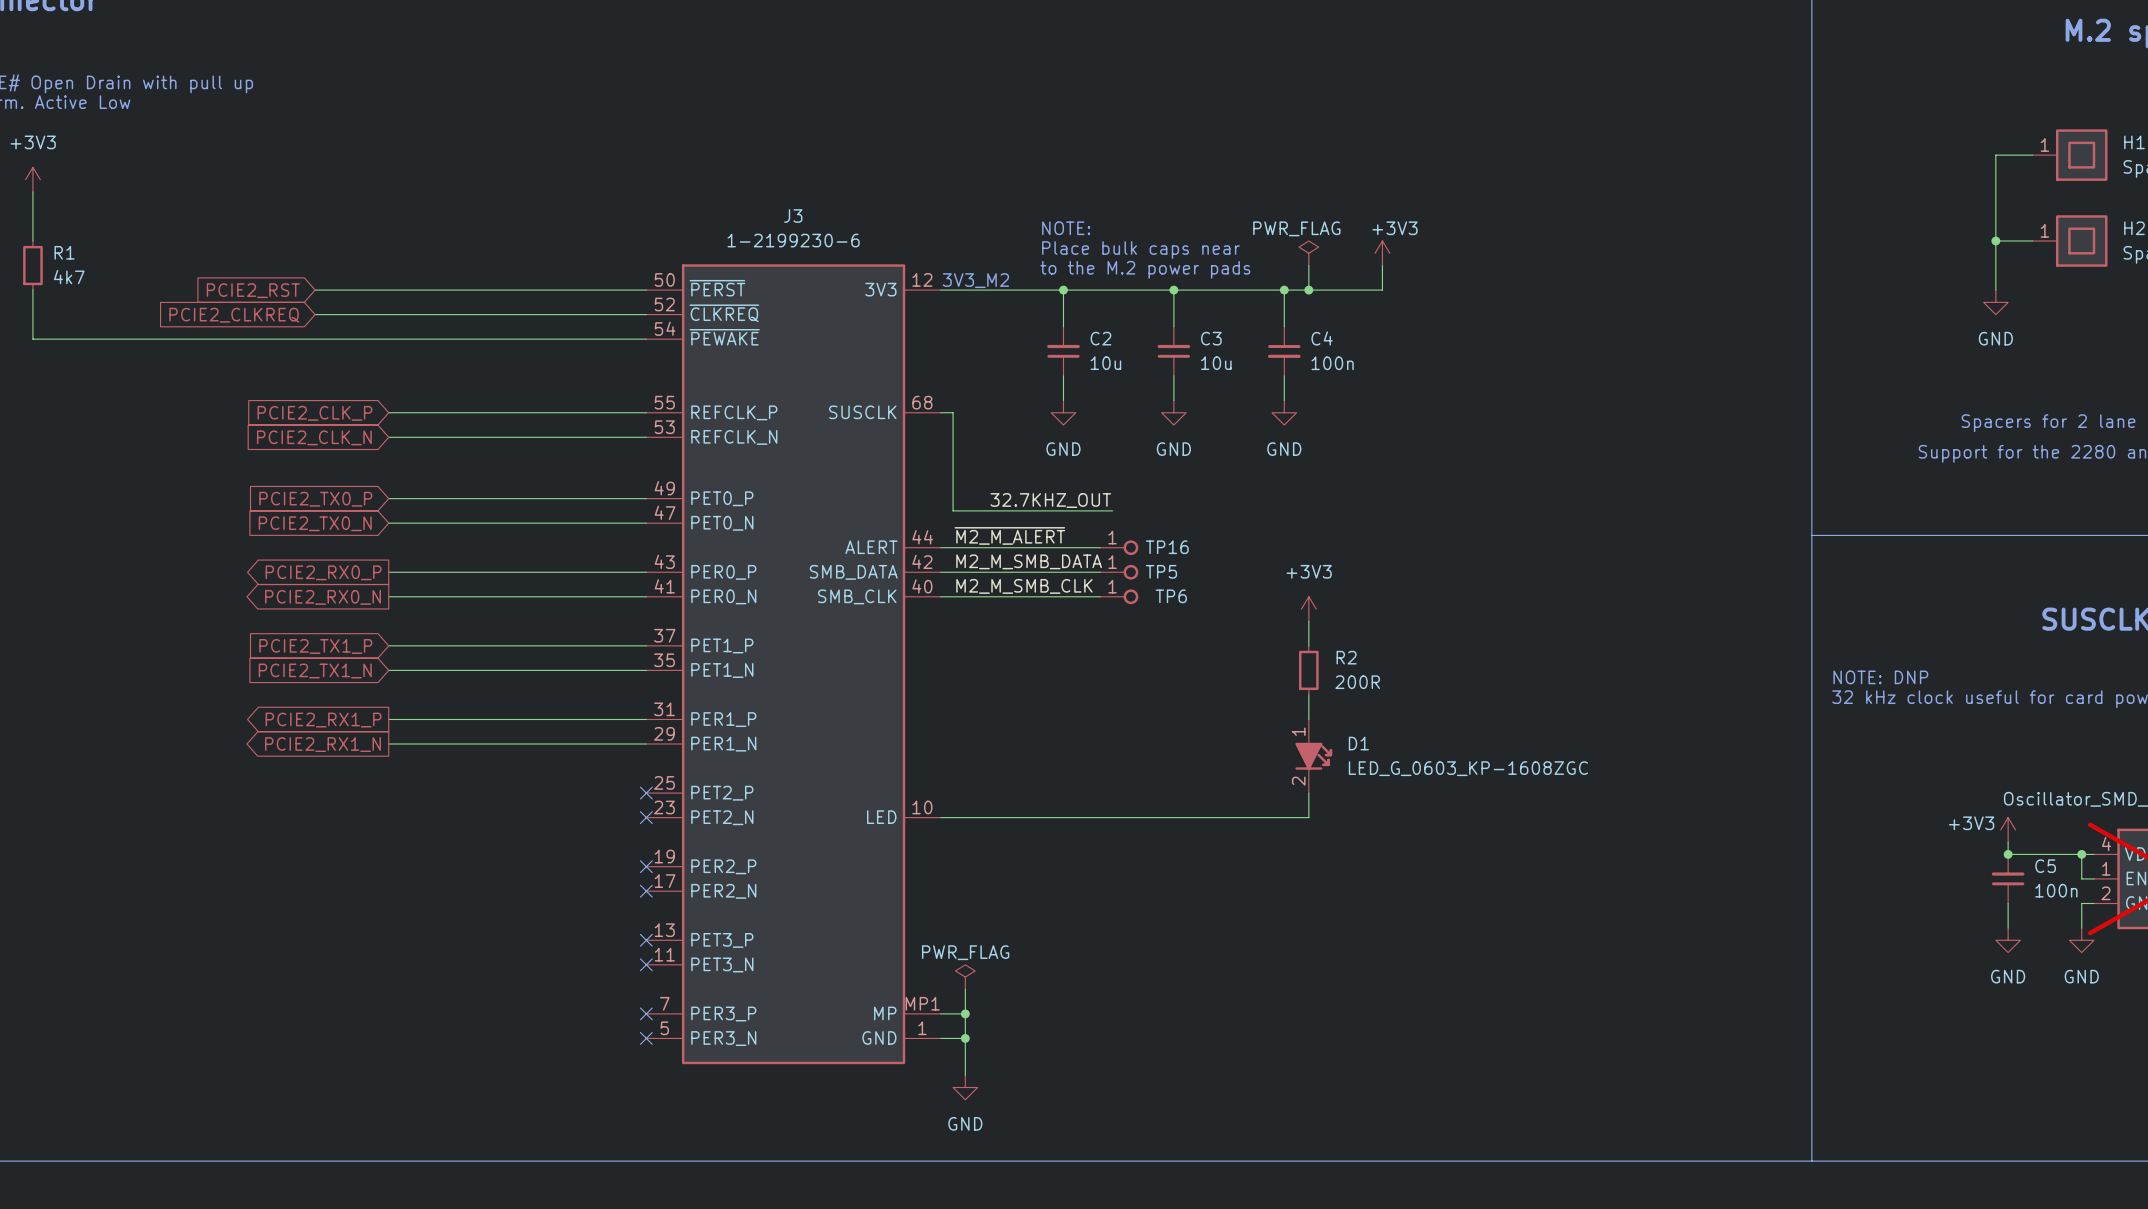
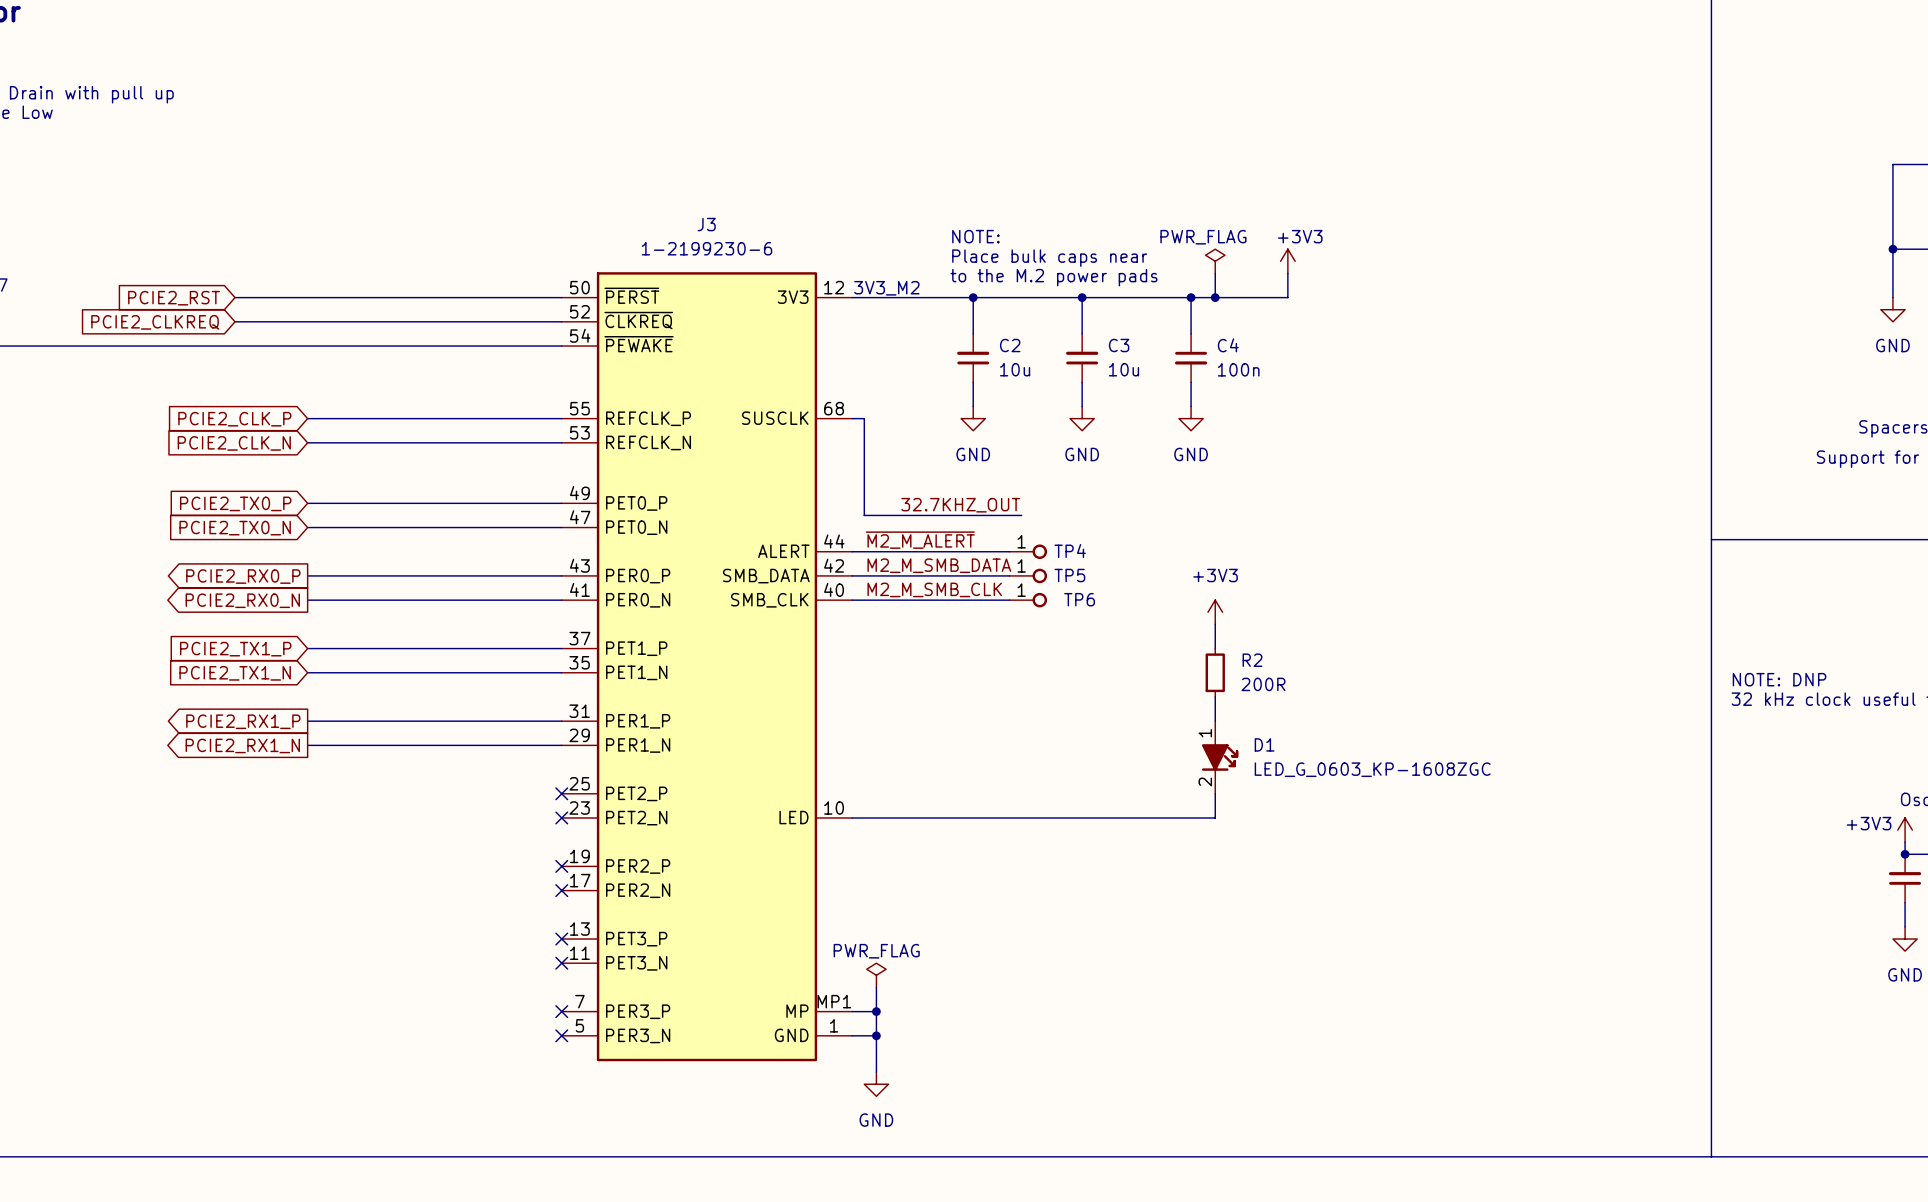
TP16 name: TP16 (1167, 547) -> TP4 (1070, 551)

